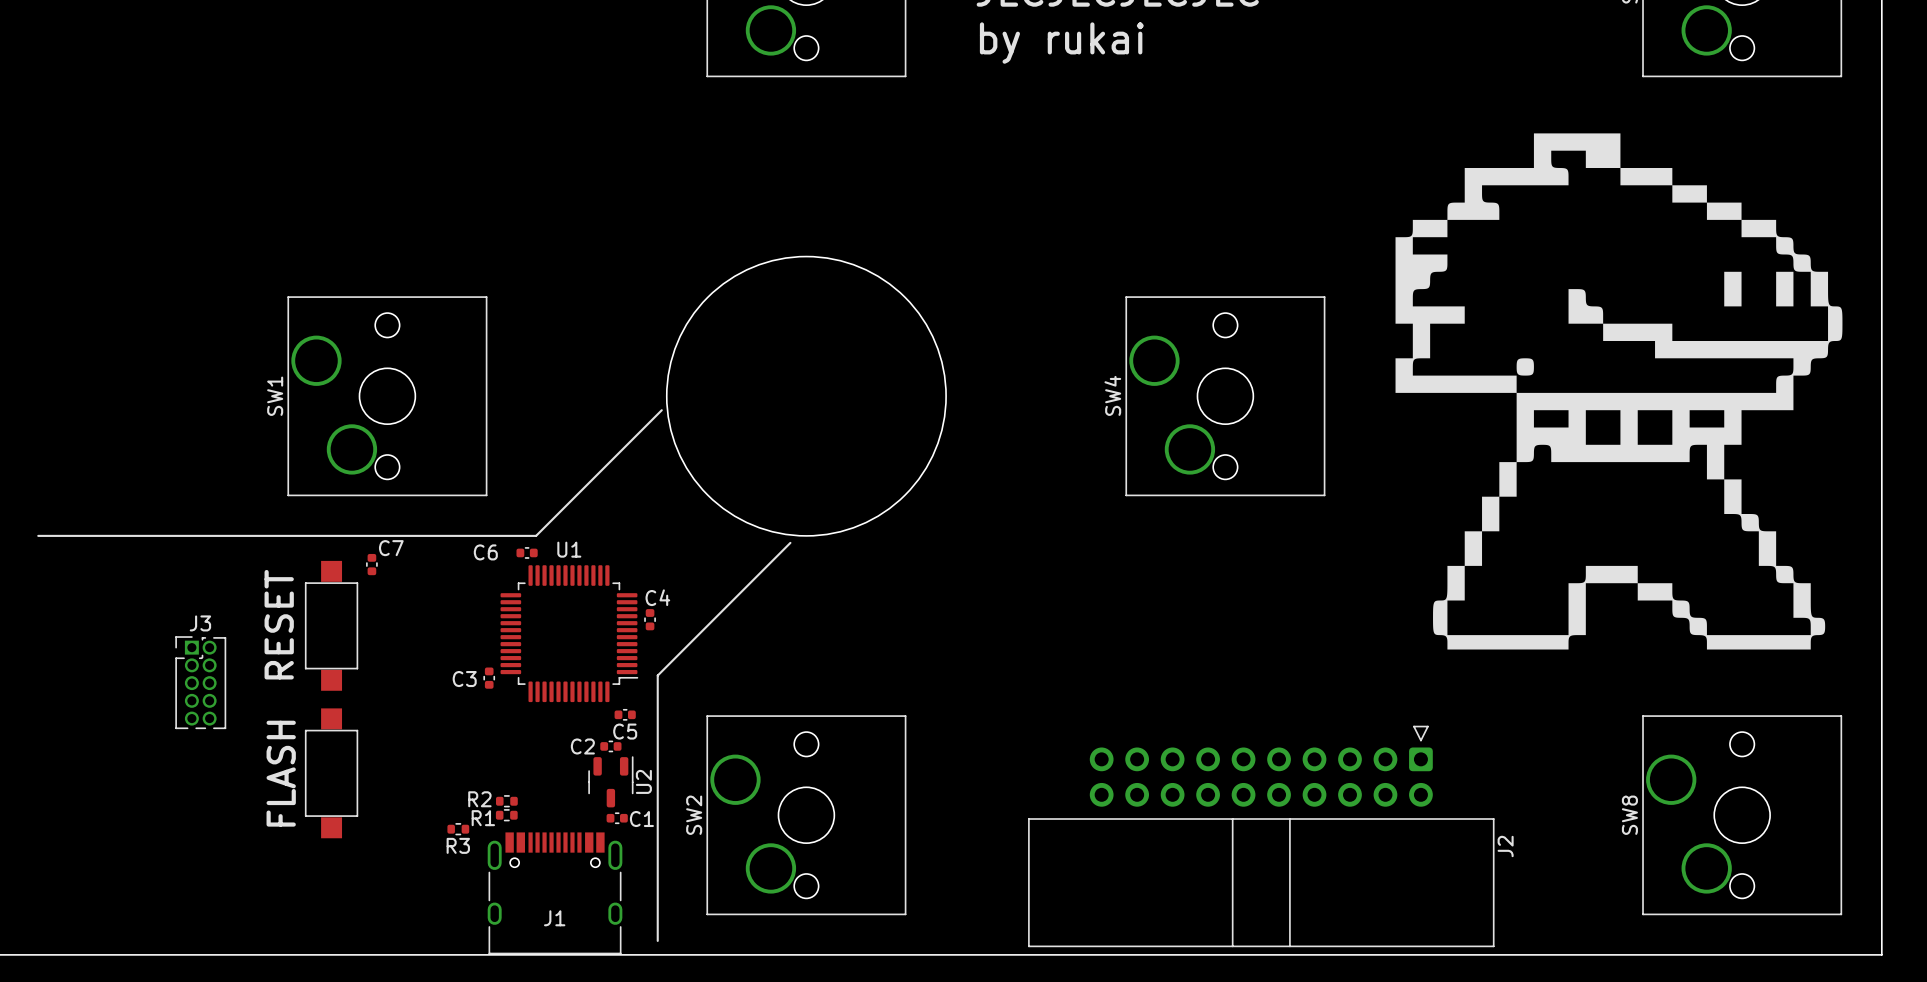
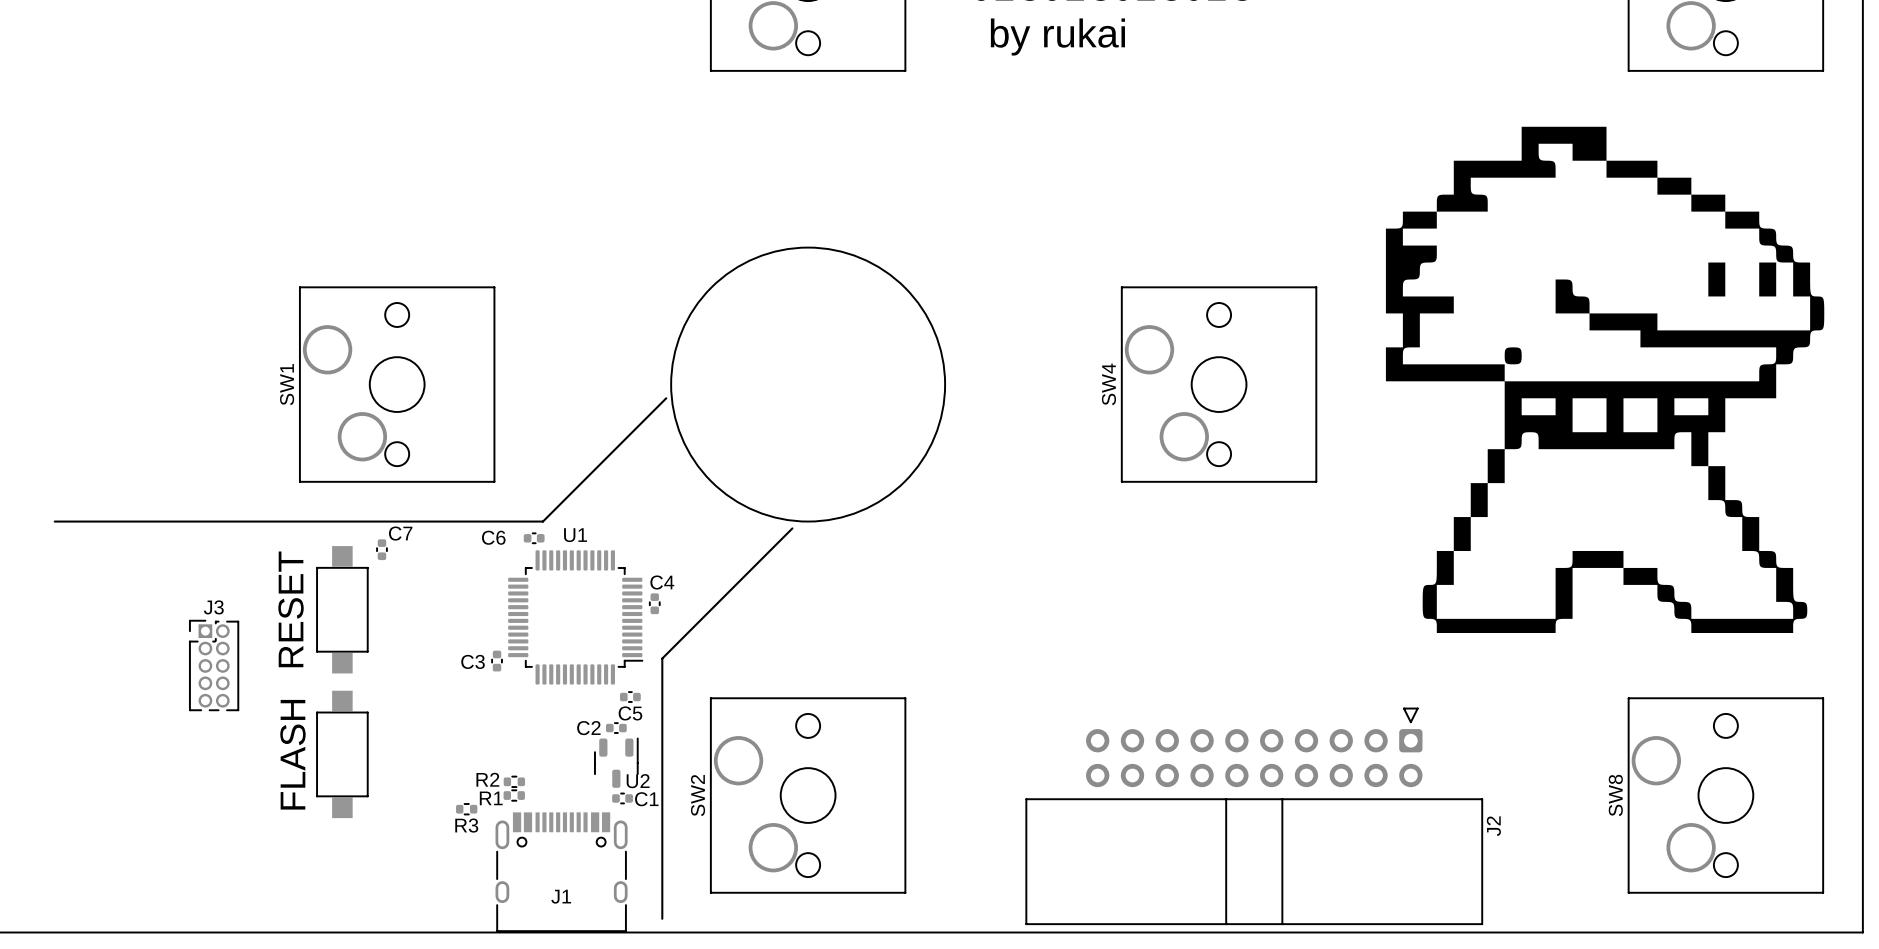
U2 name rotation: 0° (643, 781) -> 90° clockwise (638, 781)

